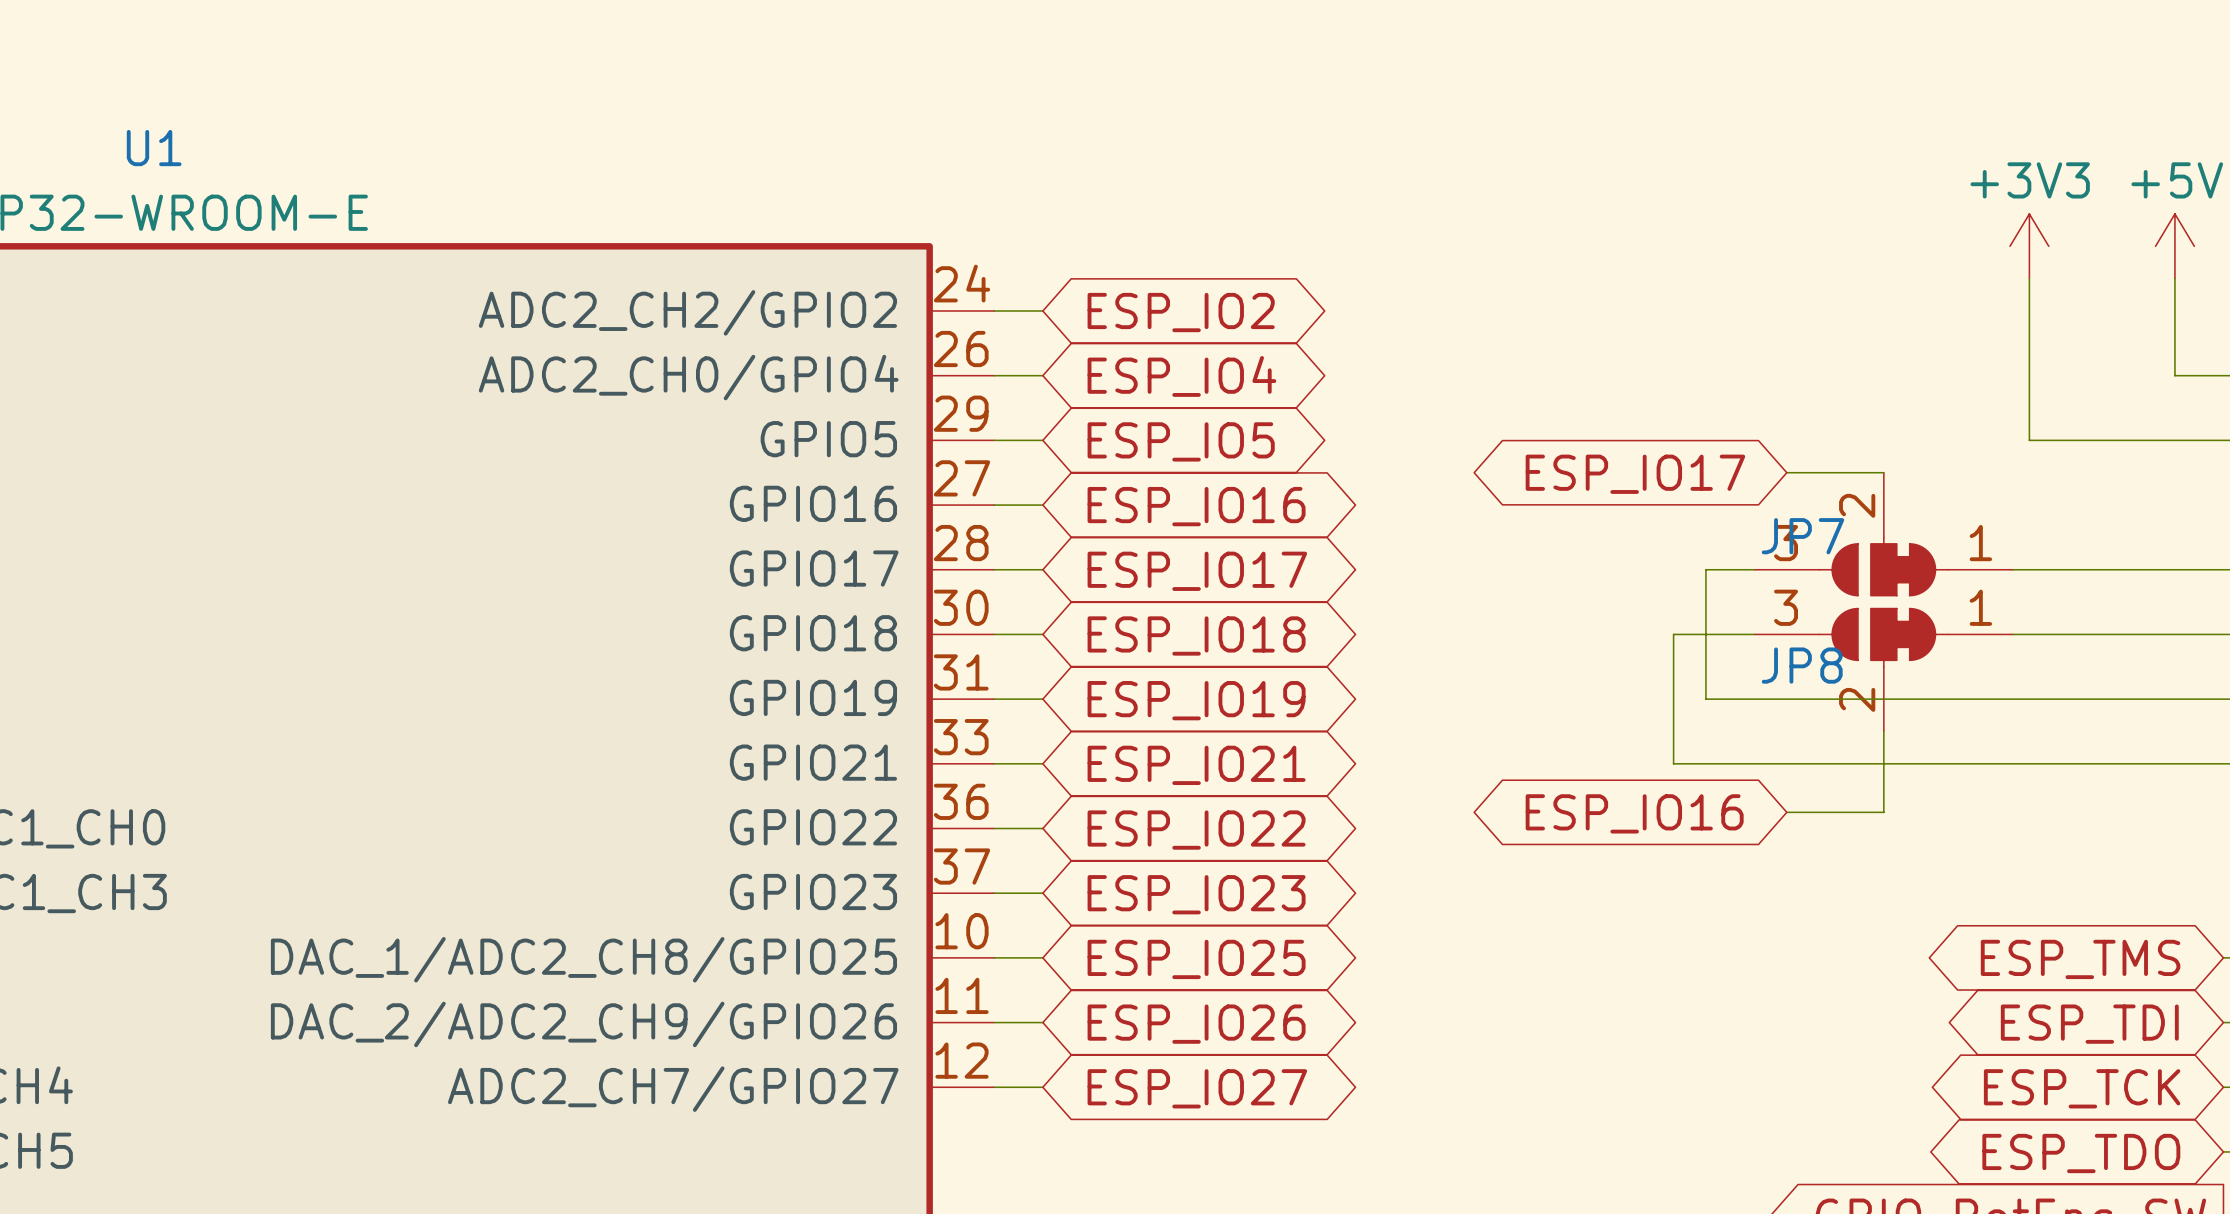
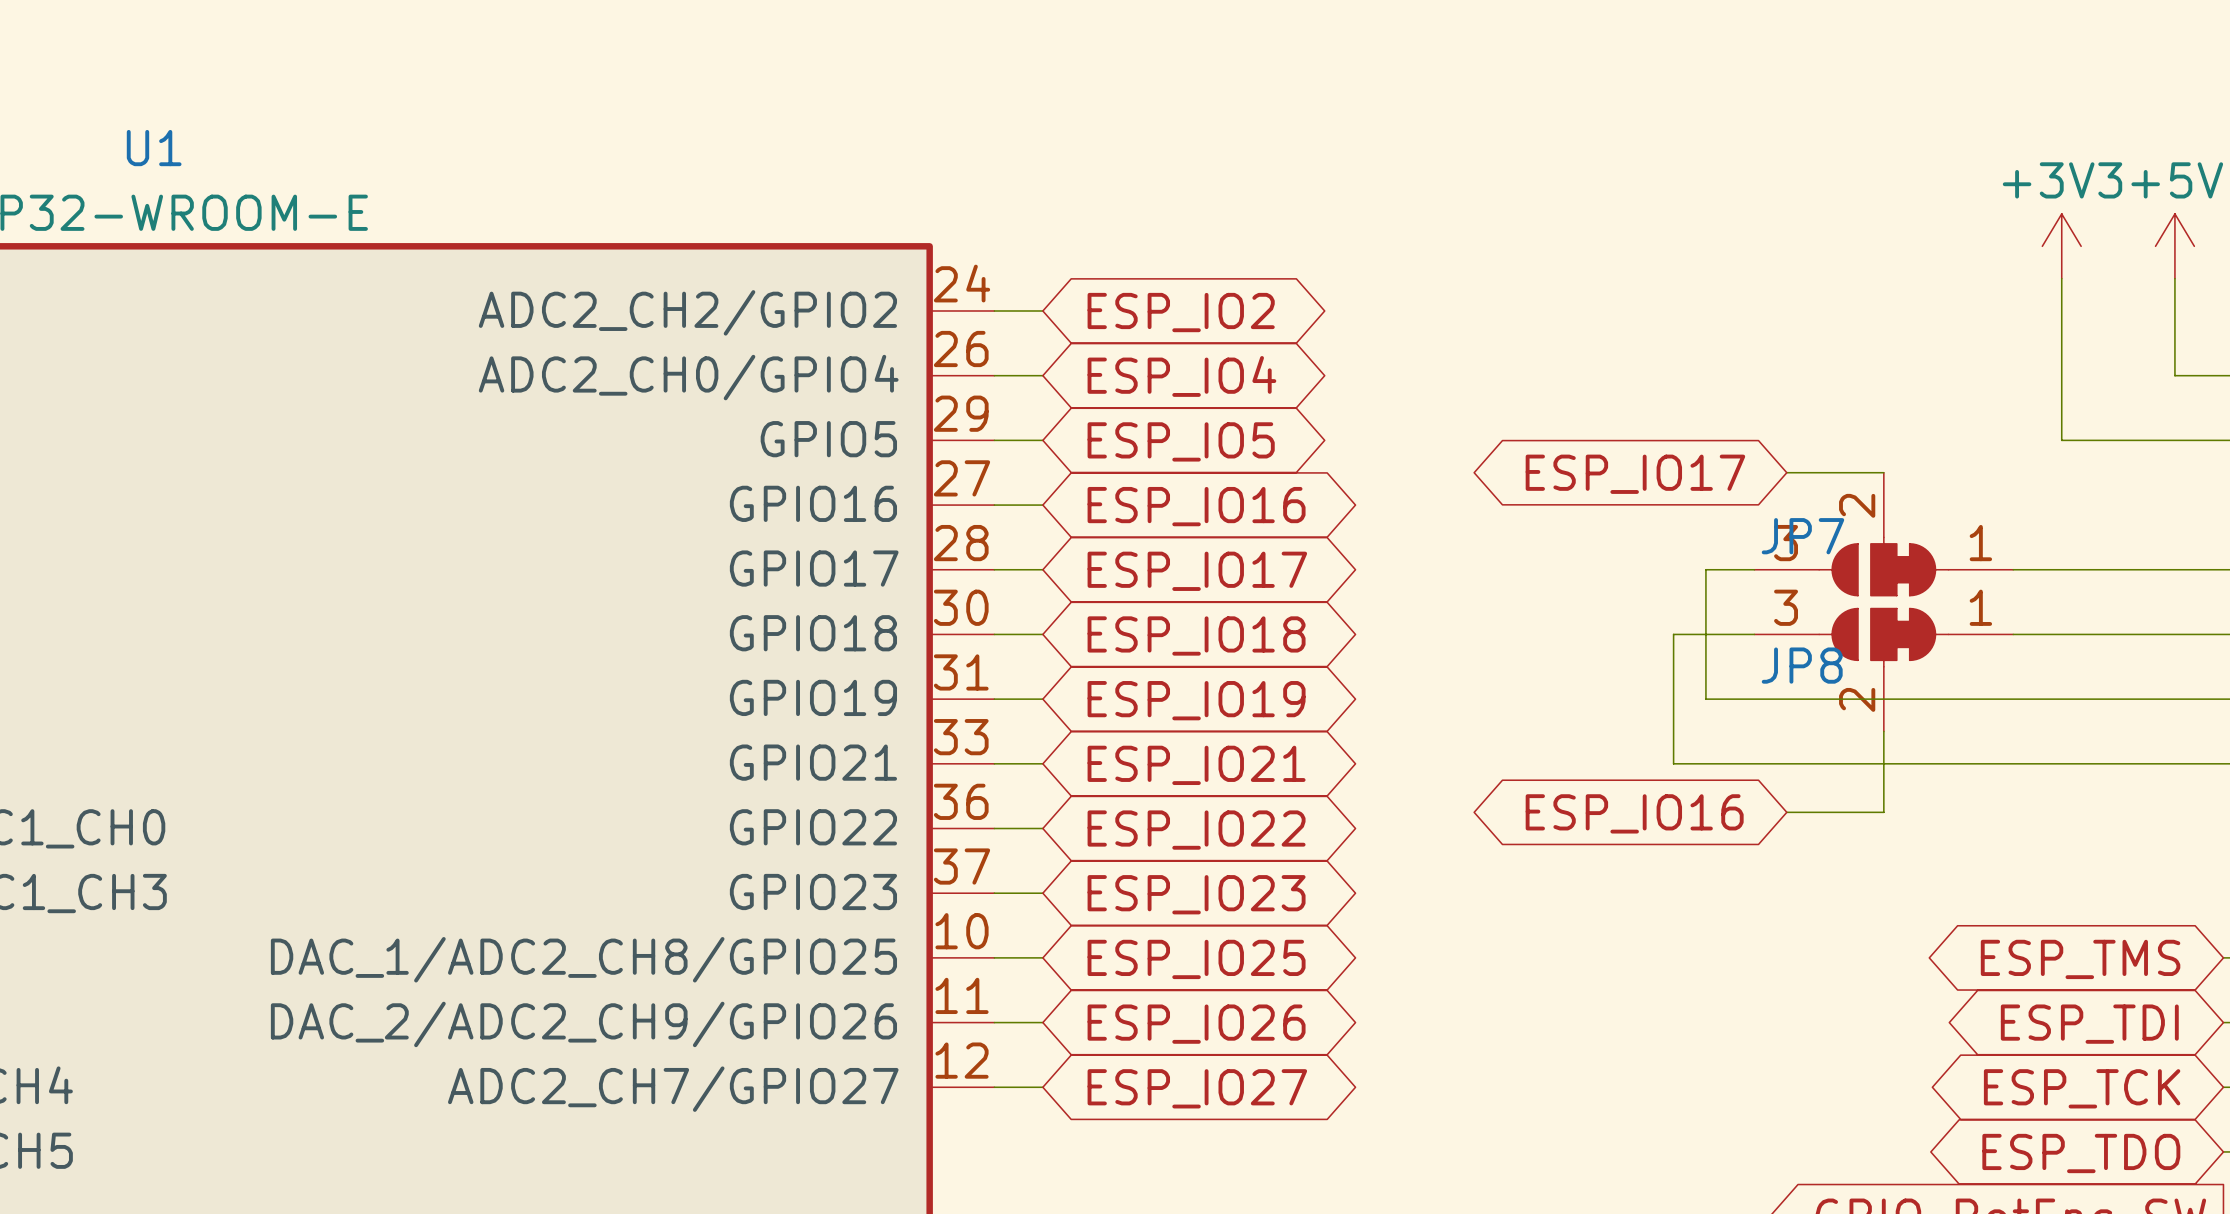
power symbol position: +3V3 (2029, 246) -> +3V3 (2061, 246)
wire: (2029, 278) (2029, 440) (2061, 440) -> (2061, 278) (2061, 440)

